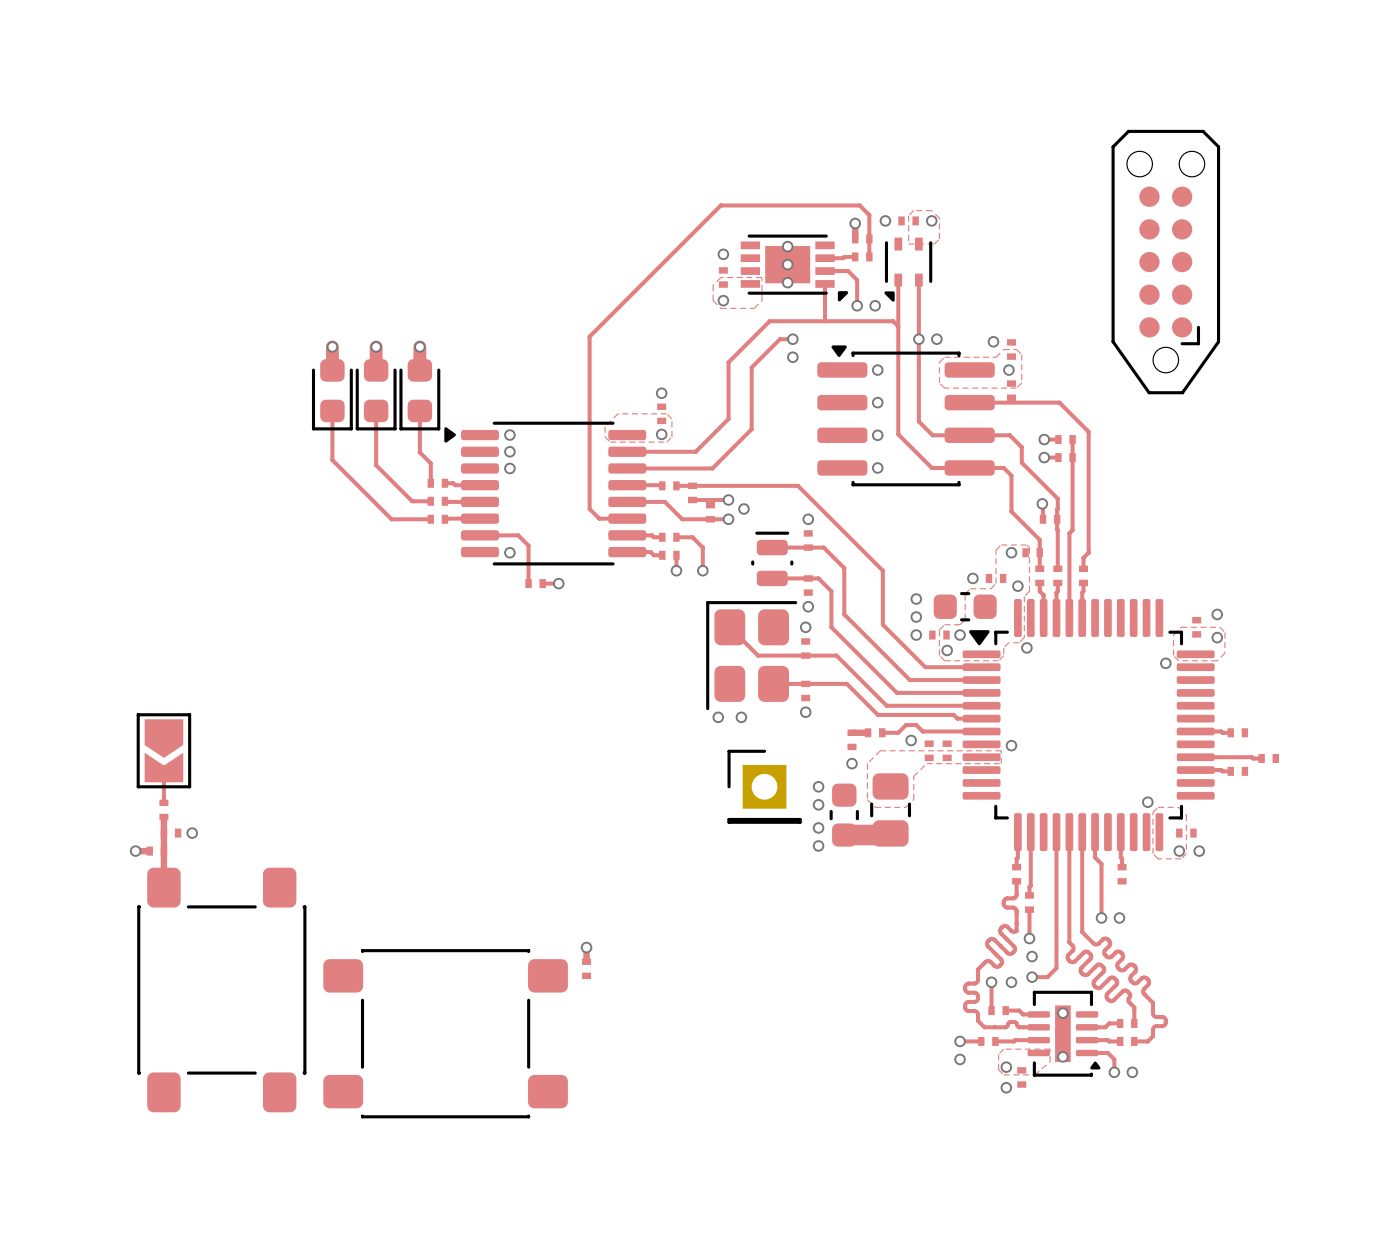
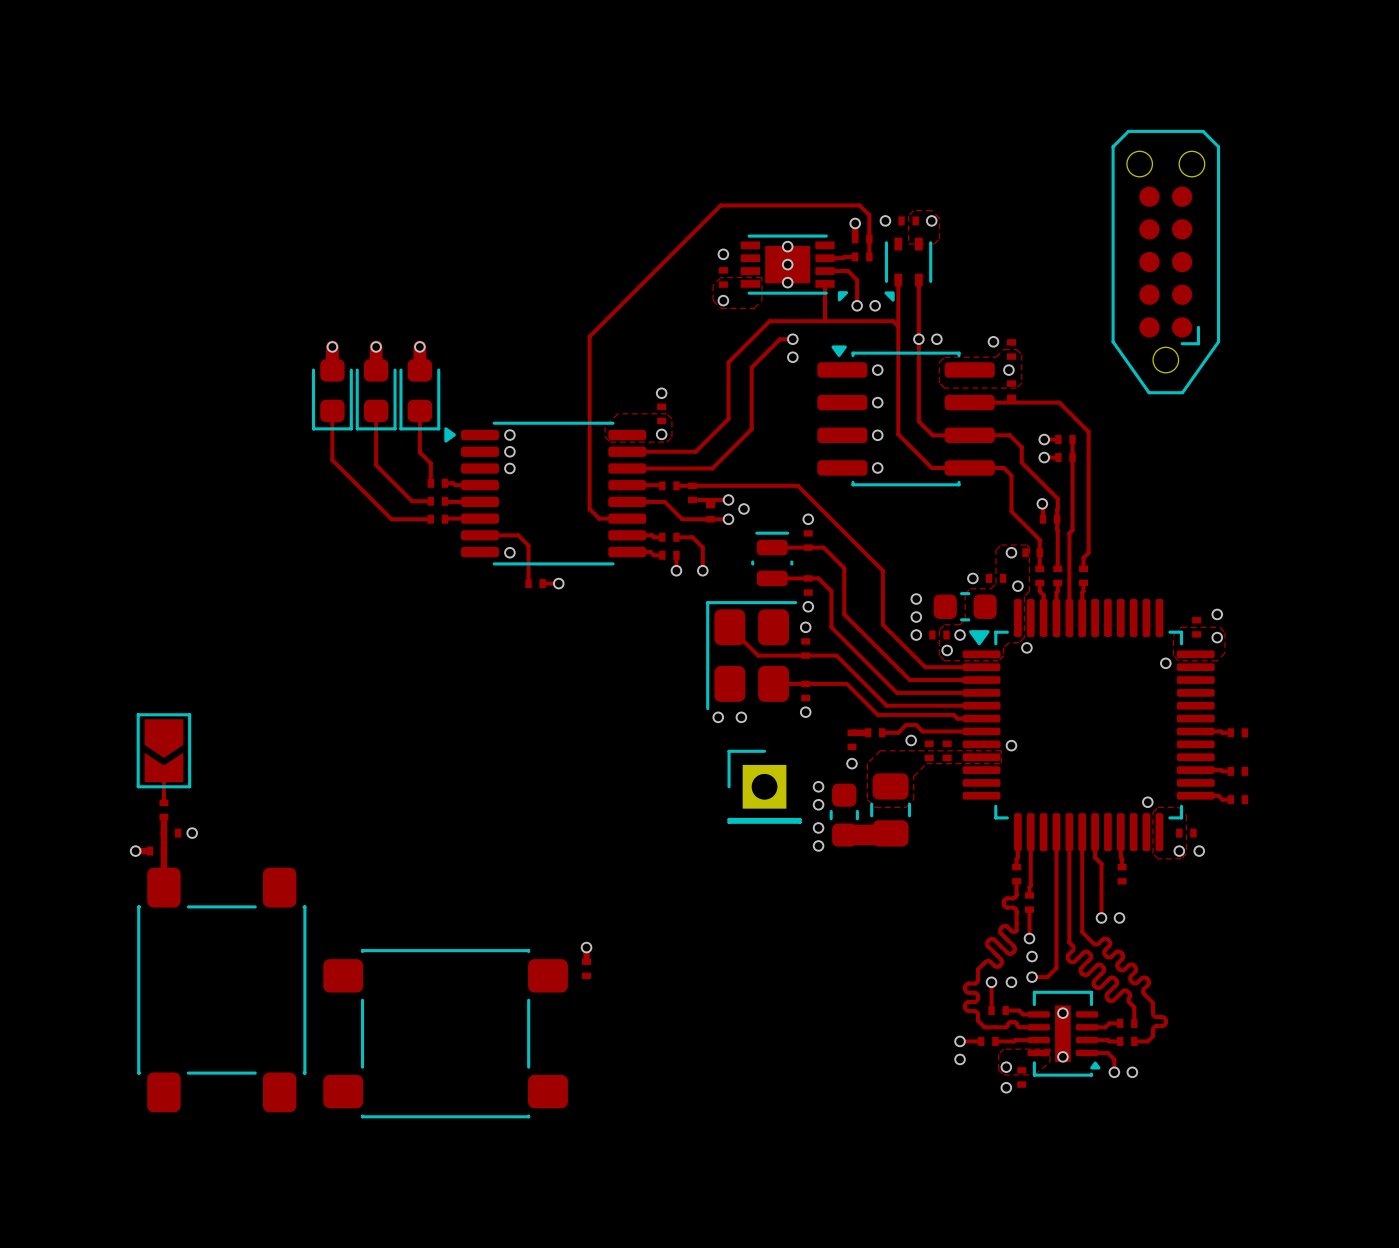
top track: (1195, 757) (1261, 758) -> none
part position: (1268, 758) -> (1237, 799)
top track: none -> (1195, 795) (1218, 795) (1222, 799) (1230, 799)

